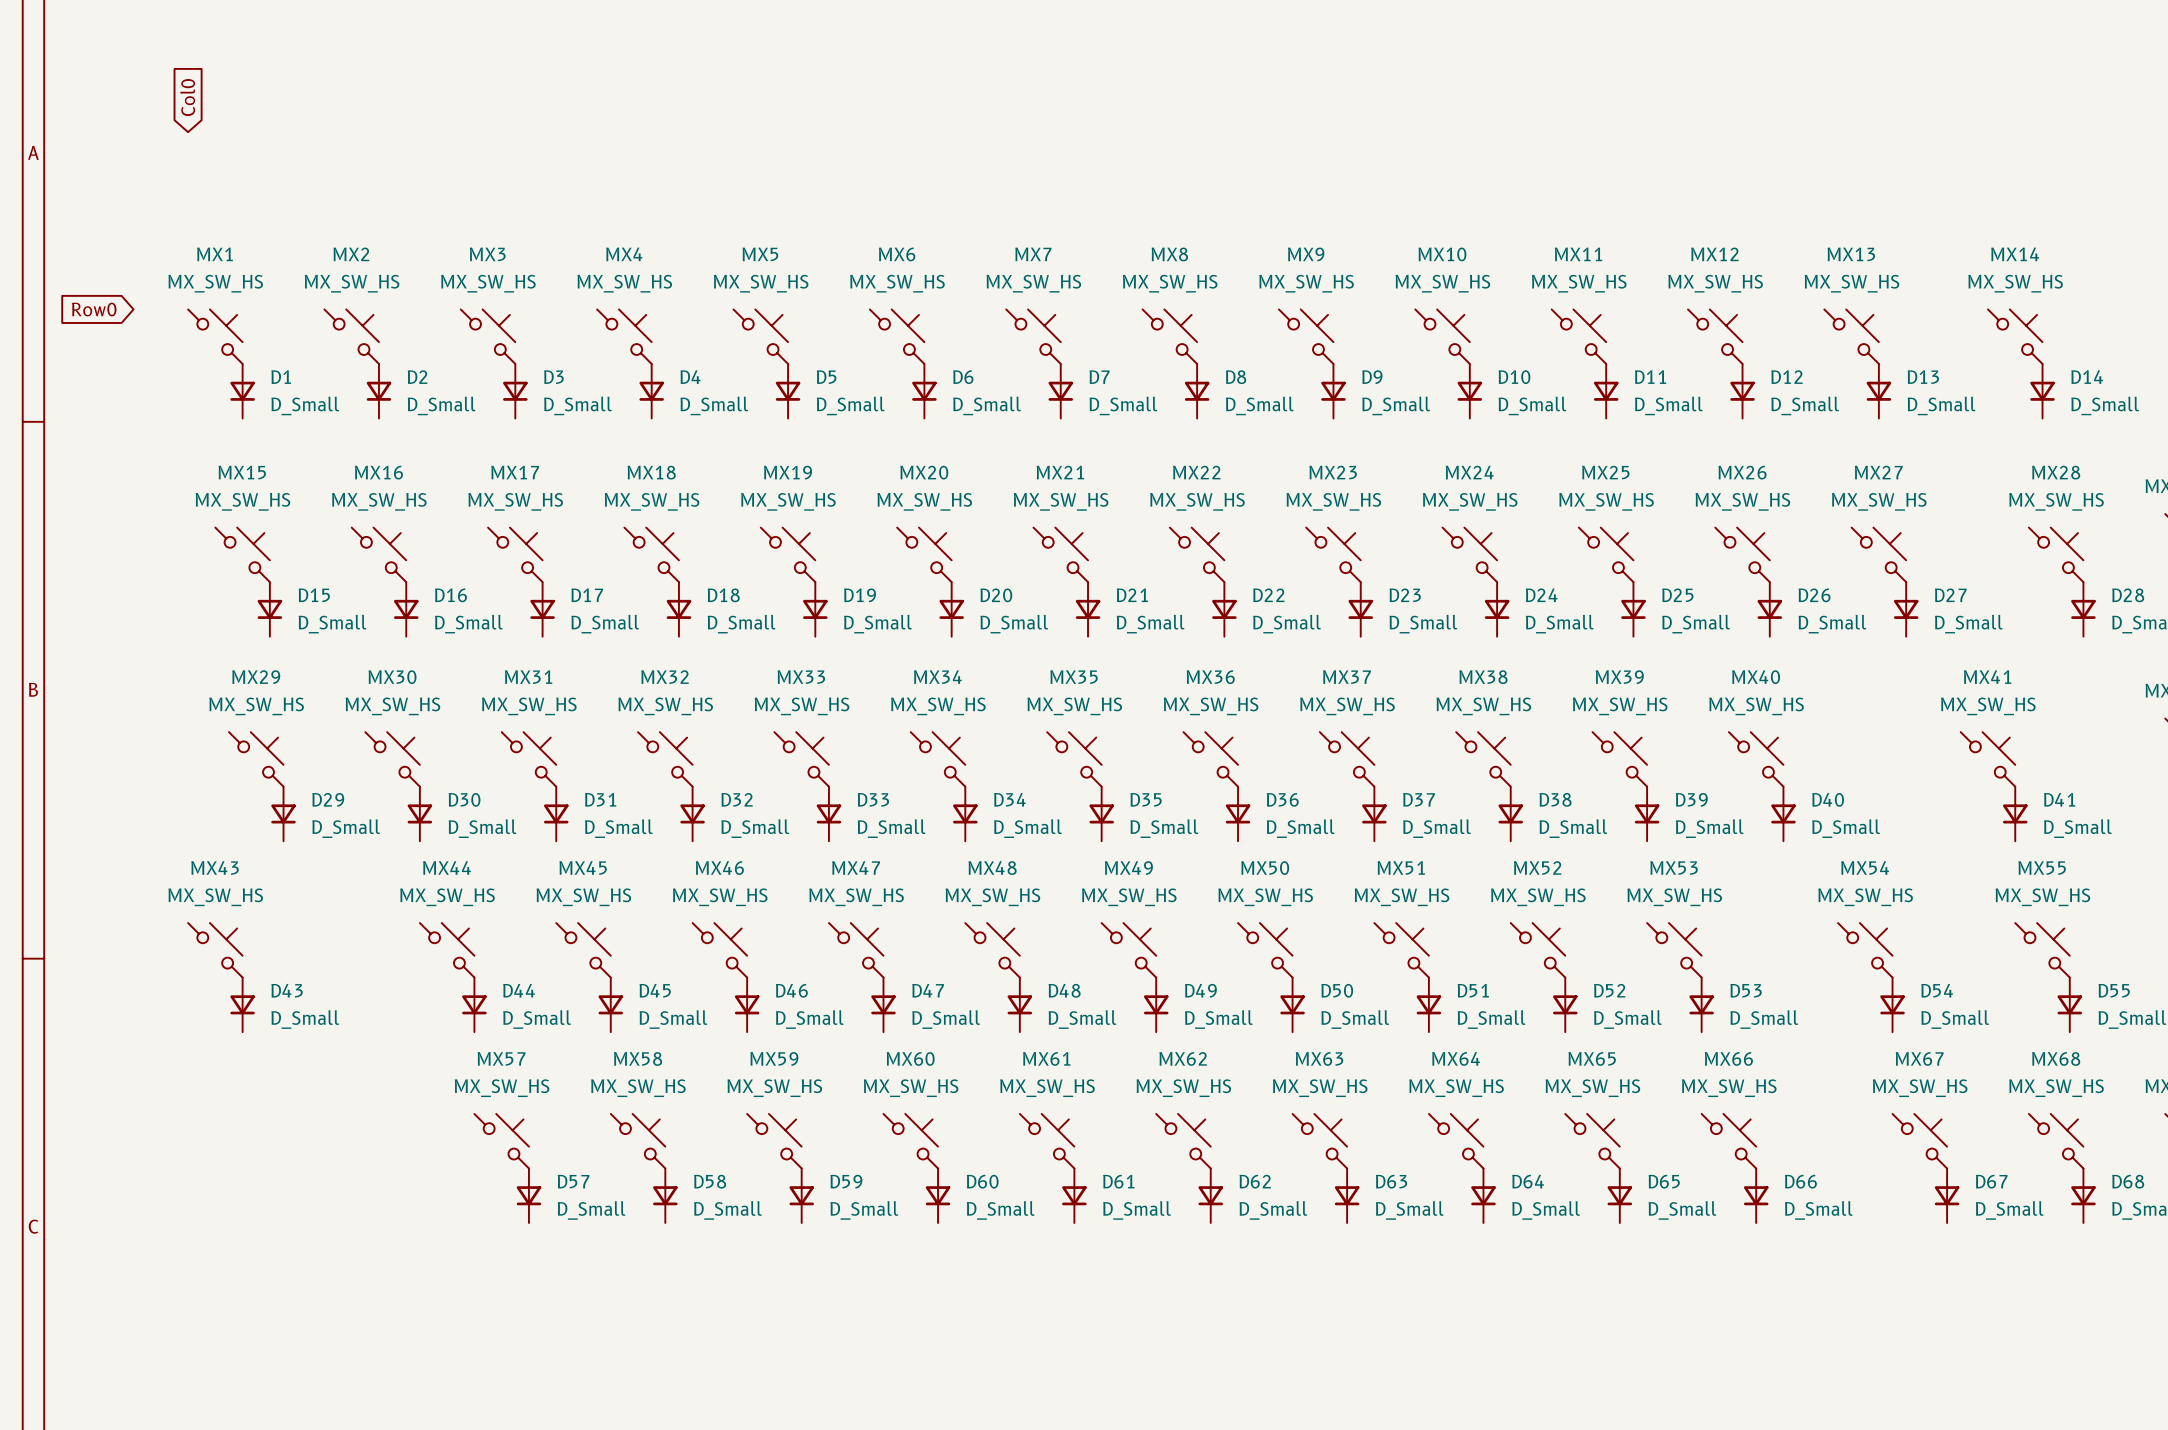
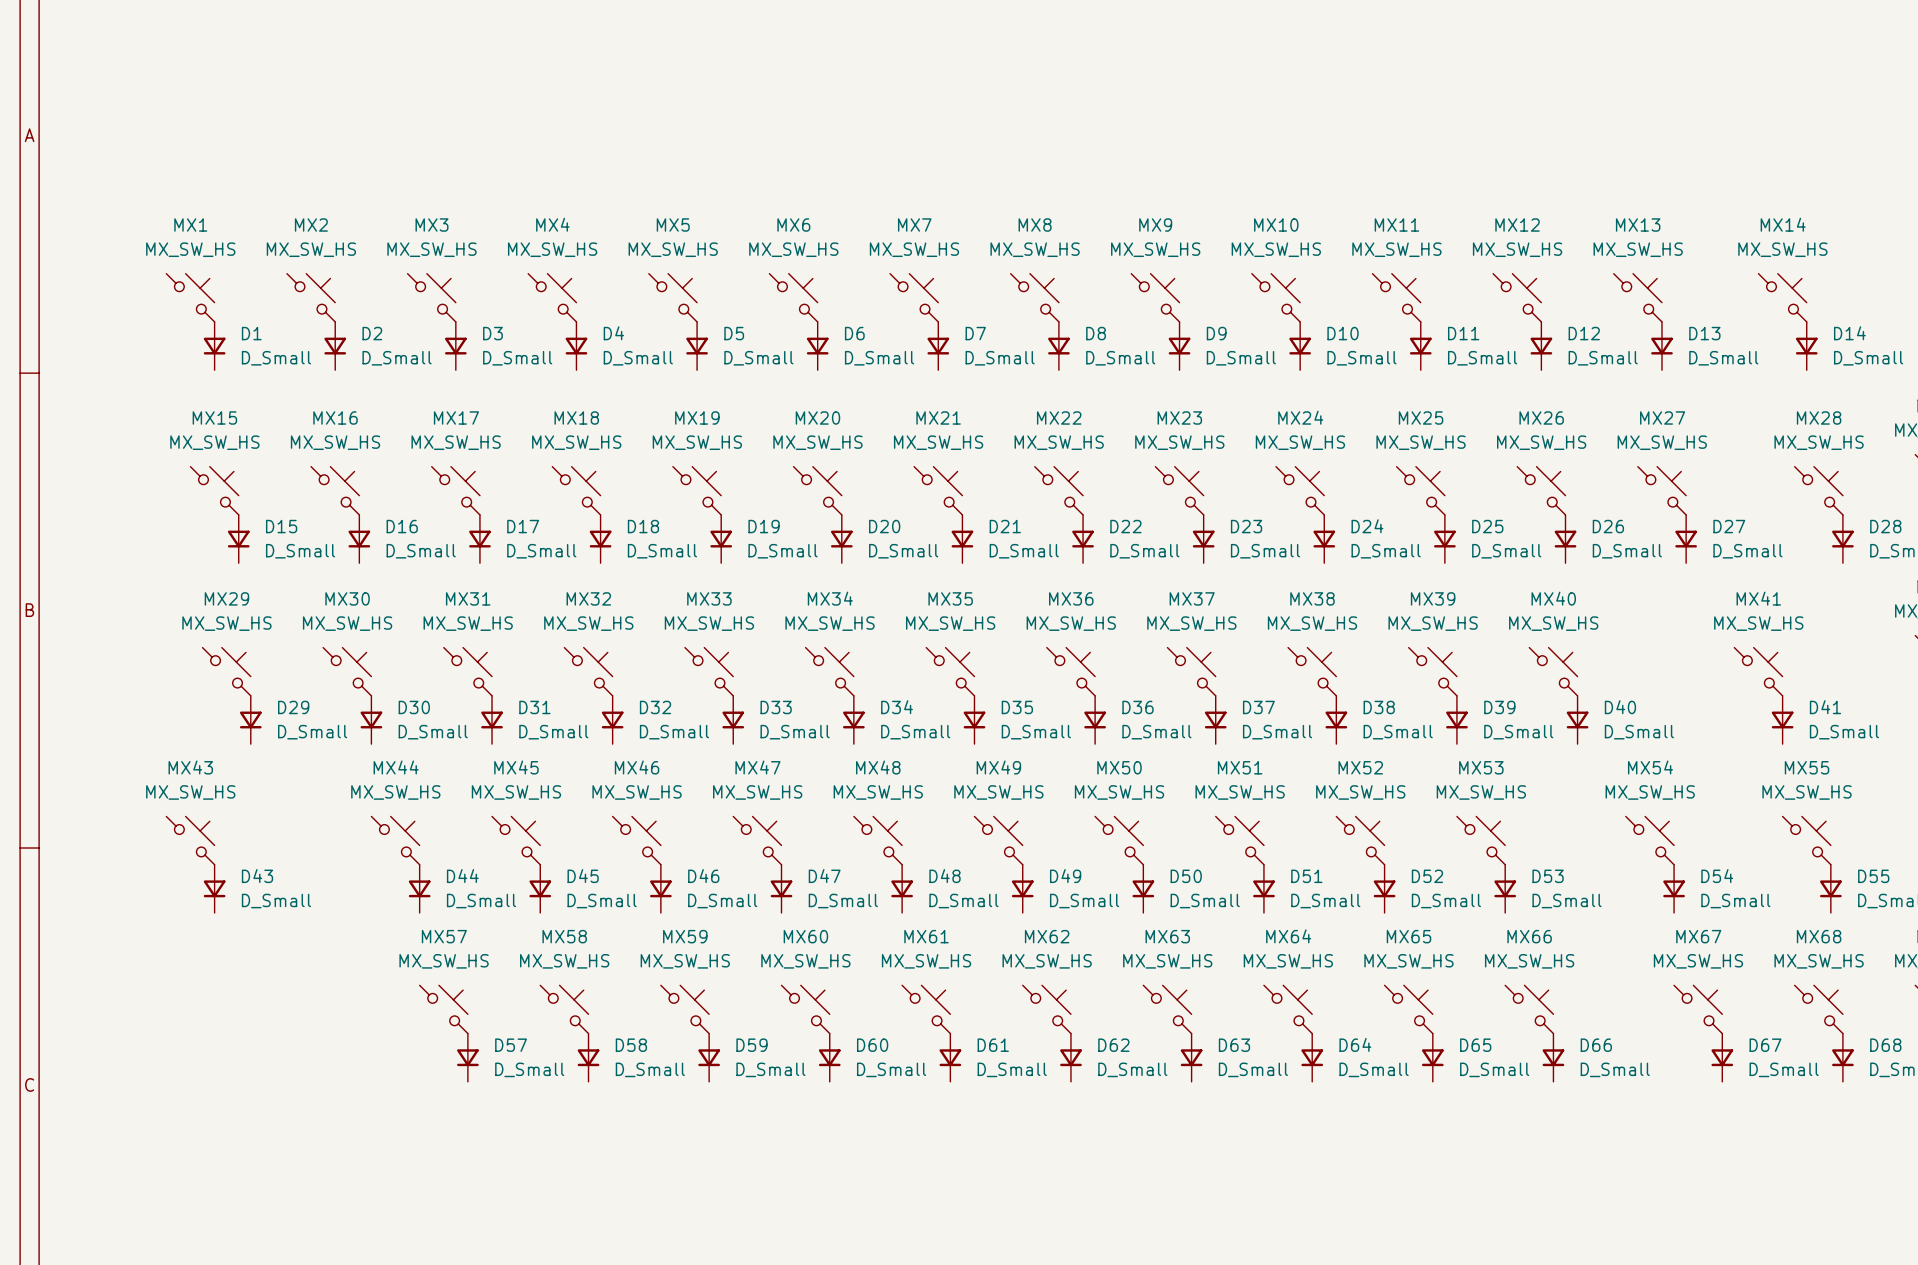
global label: Col0 (187, 97) -> none
global label: Row0 (94, 309) -> none

